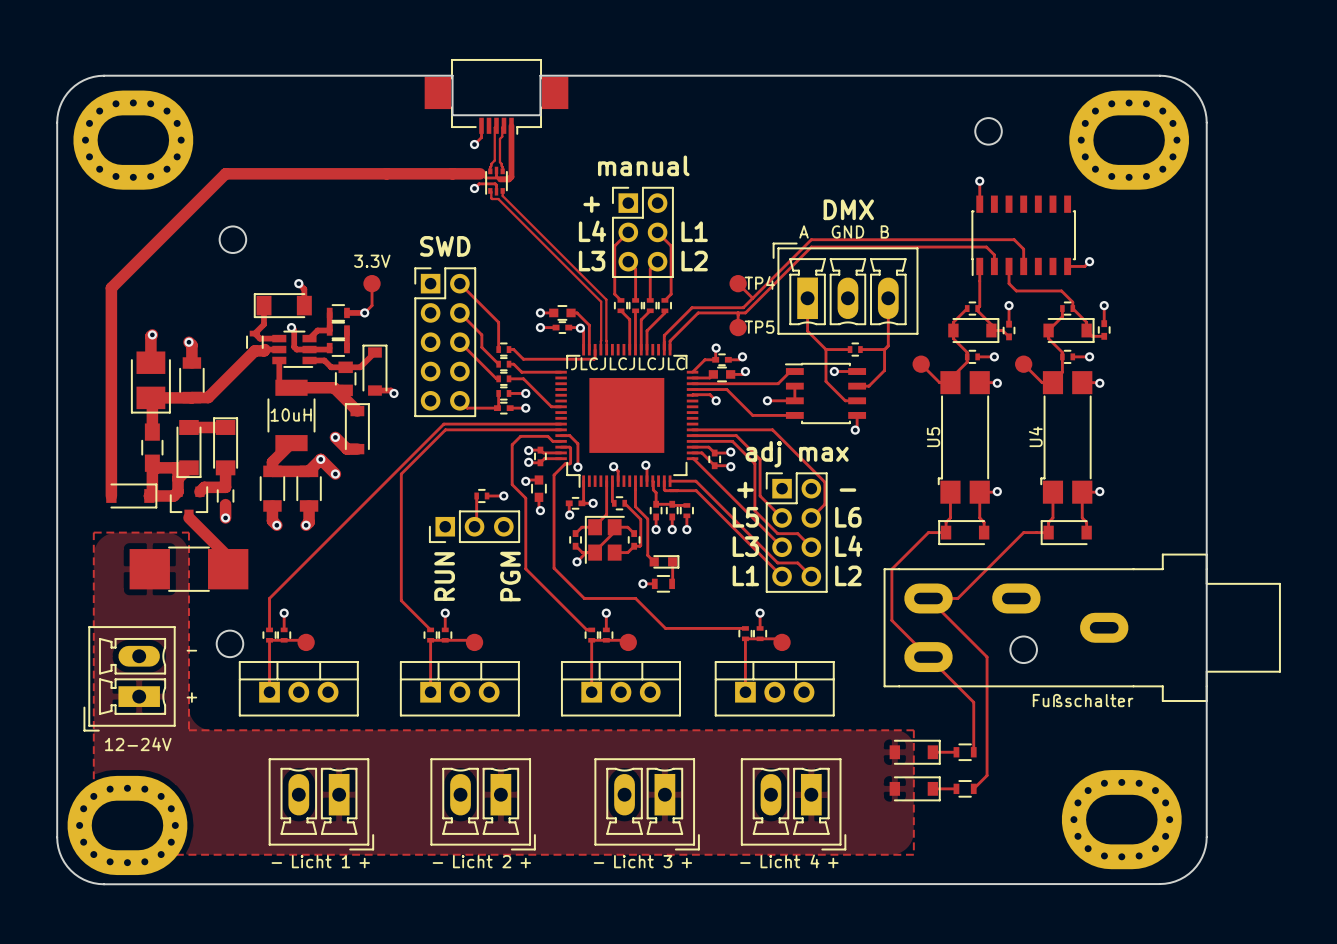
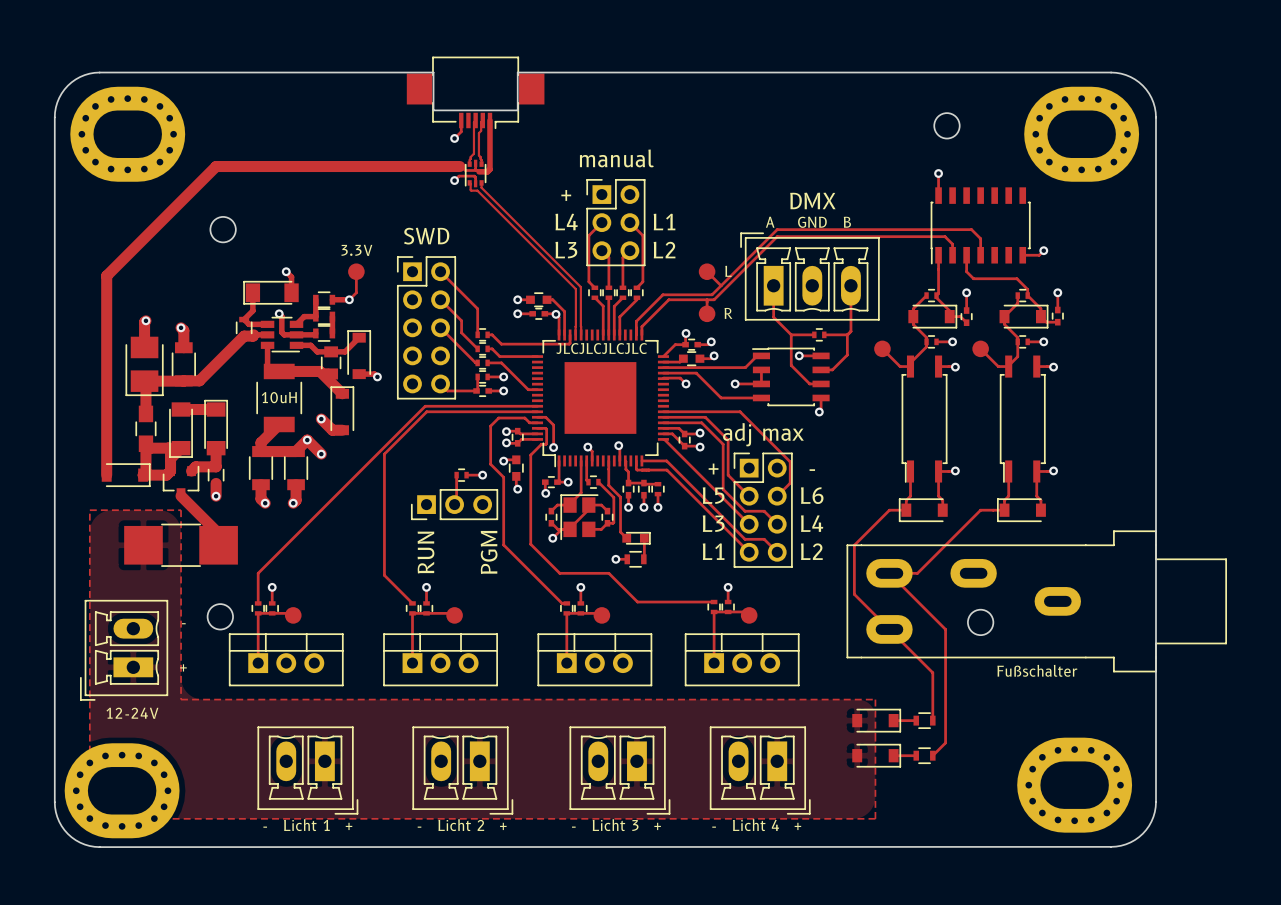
TP4 name: TP4 (759, 282) -> L (728, 271)
TP5 name: TP5 (759, 327) -> R (728, 313)
U5: (963, 437) -> none
part: none -> (924, 419)
U4: (1066, 437) -> none
part: none -> (1022, 419)

